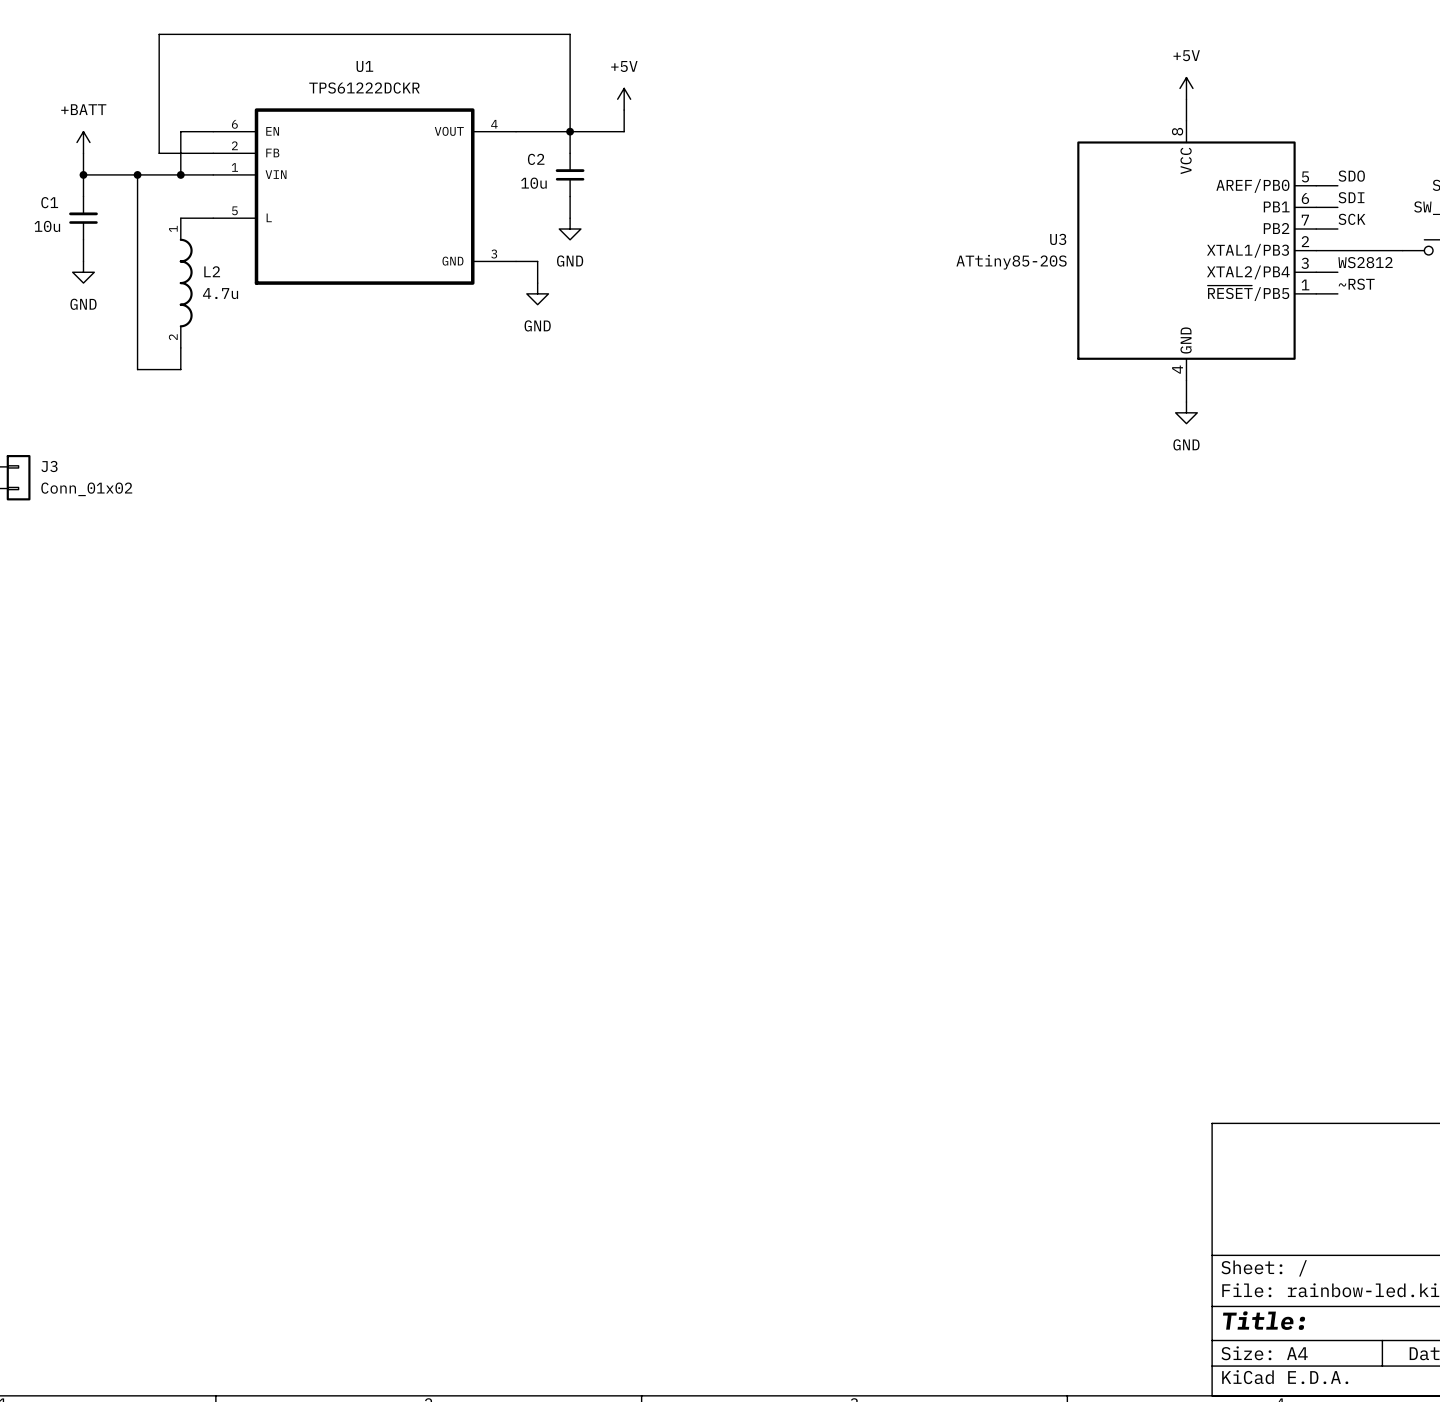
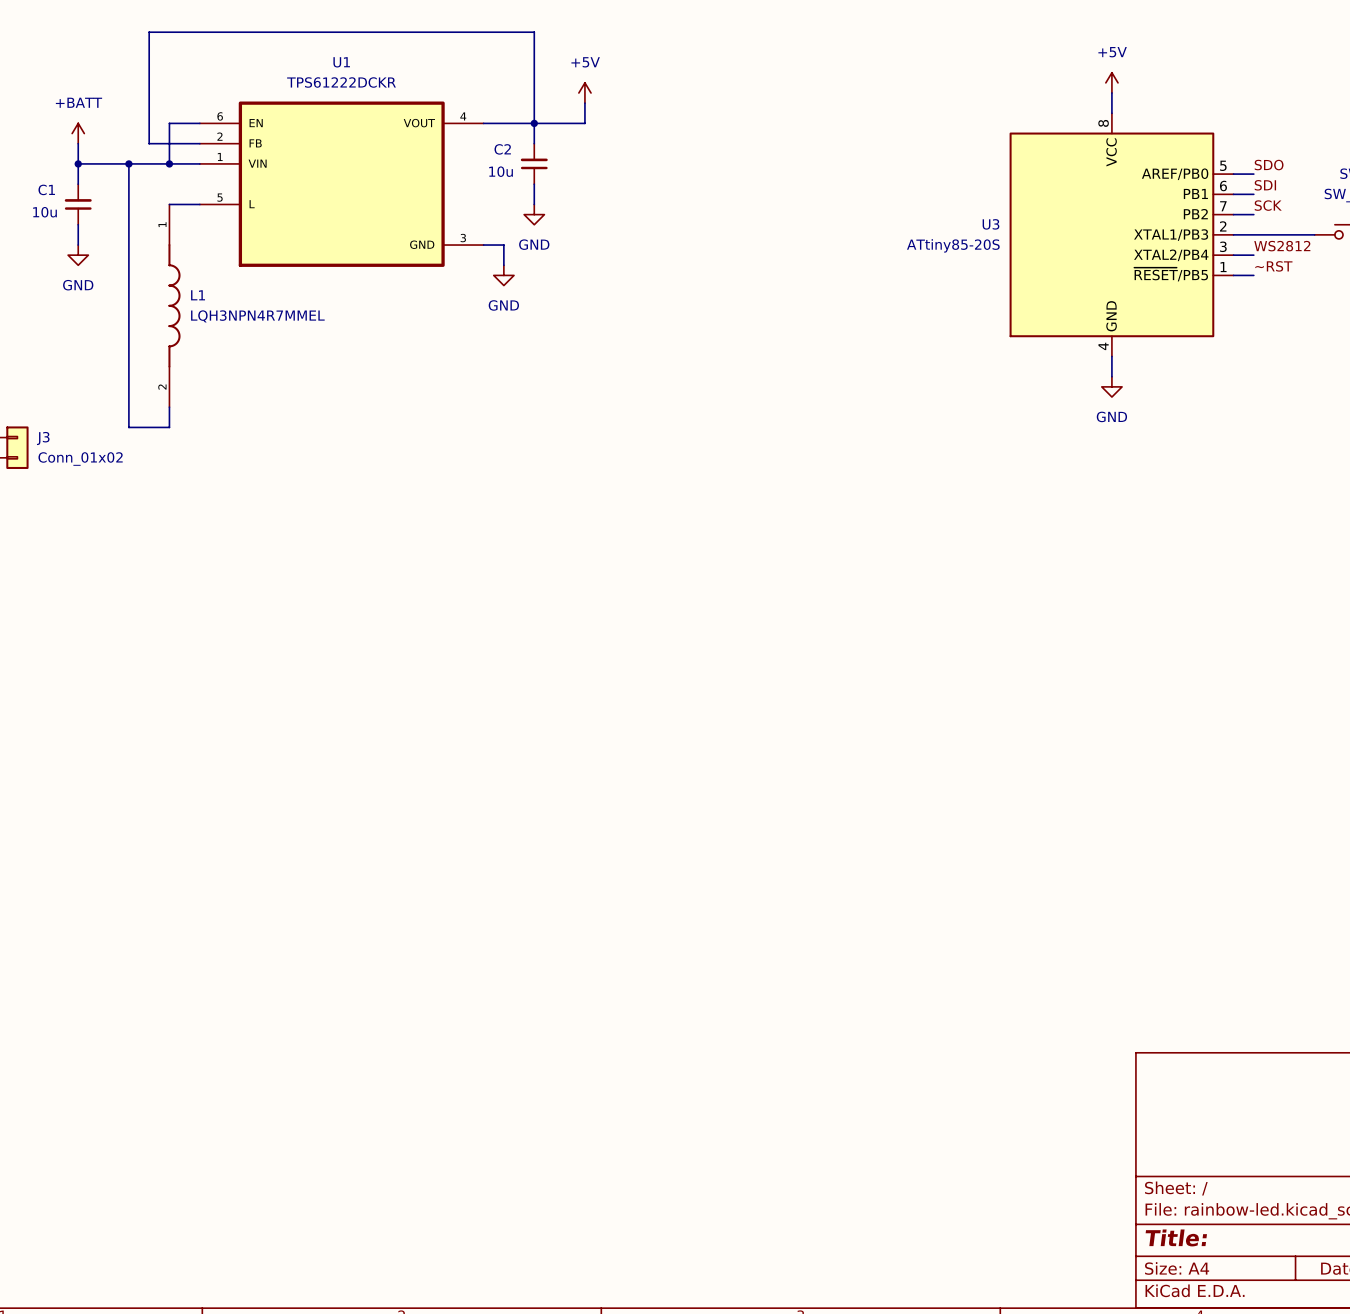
L2: 4.7u (186, 283) -> none
L1: none -> LQH3NPN4R7MMEL (174, 305)
wire: (180, 347) (180, 369) (137, 369) -> (169, 407) (169, 427) (128, 427) (128, 346)

